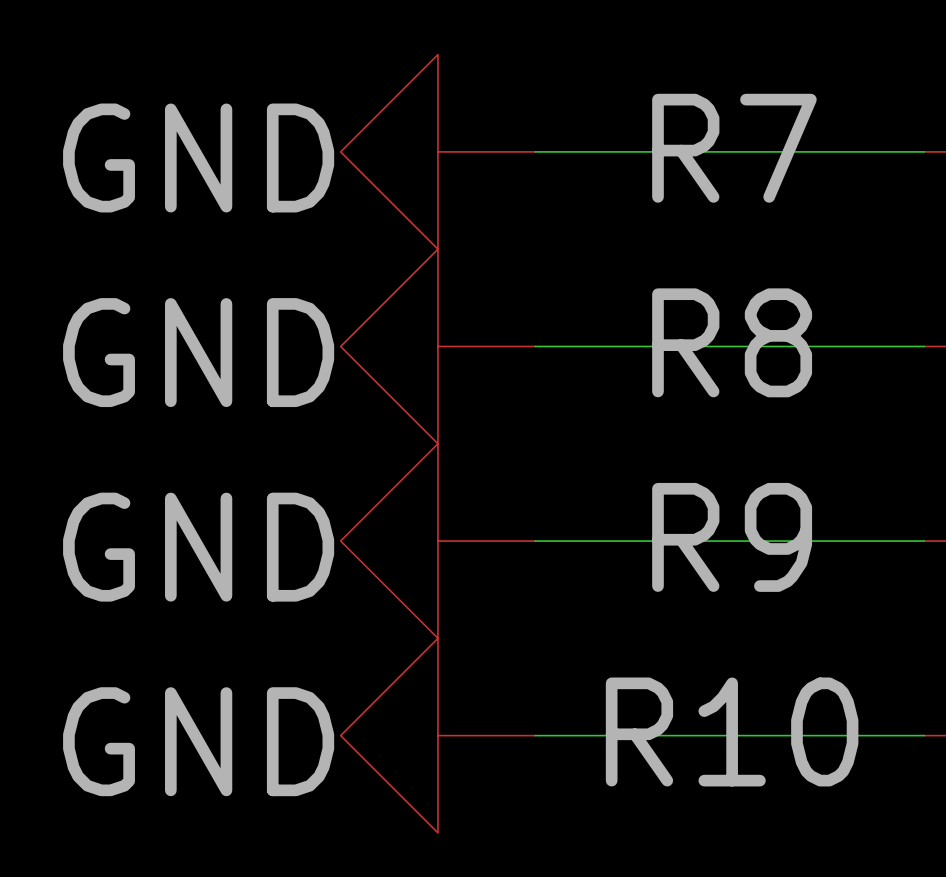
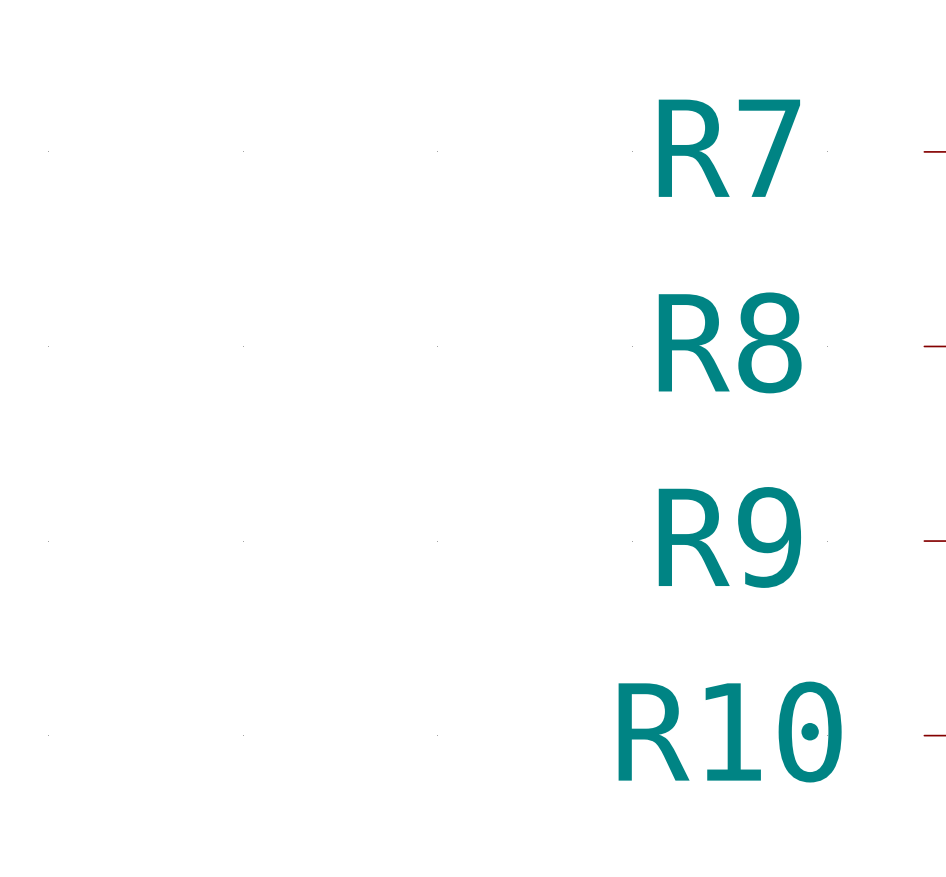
power symbol: GND (437, 151) -> none
wire: (535, 151) (924, 151) -> none
power symbol: GND (437, 346) -> none
wire: (535, 346) (924, 346) -> none
power symbol: GND (437, 541) -> none
wire: (535, 541) (924, 541) -> none
power symbol: GND (437, 735) -> none
wire: (535, 735) (924, 735) -> none

